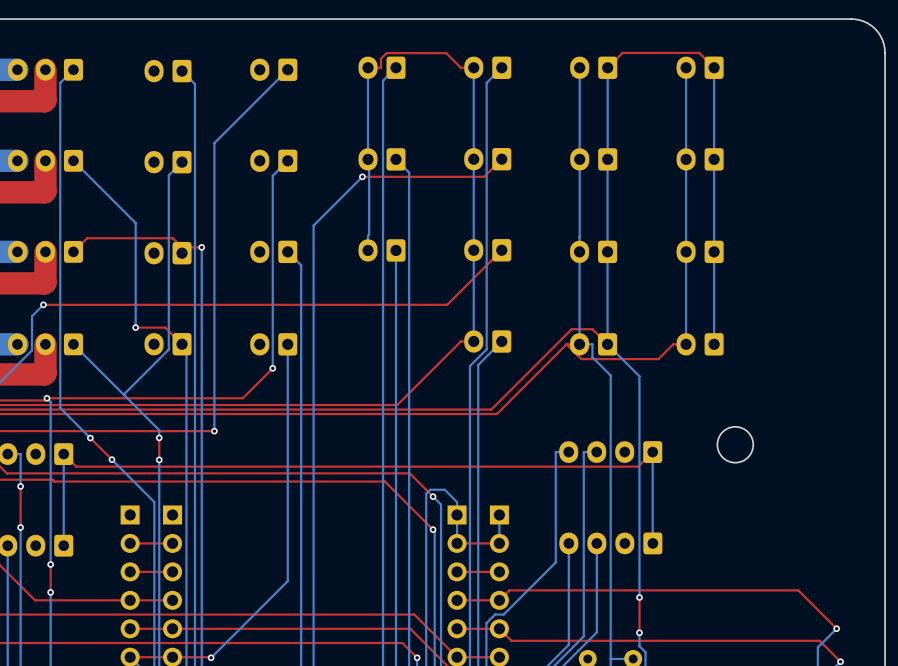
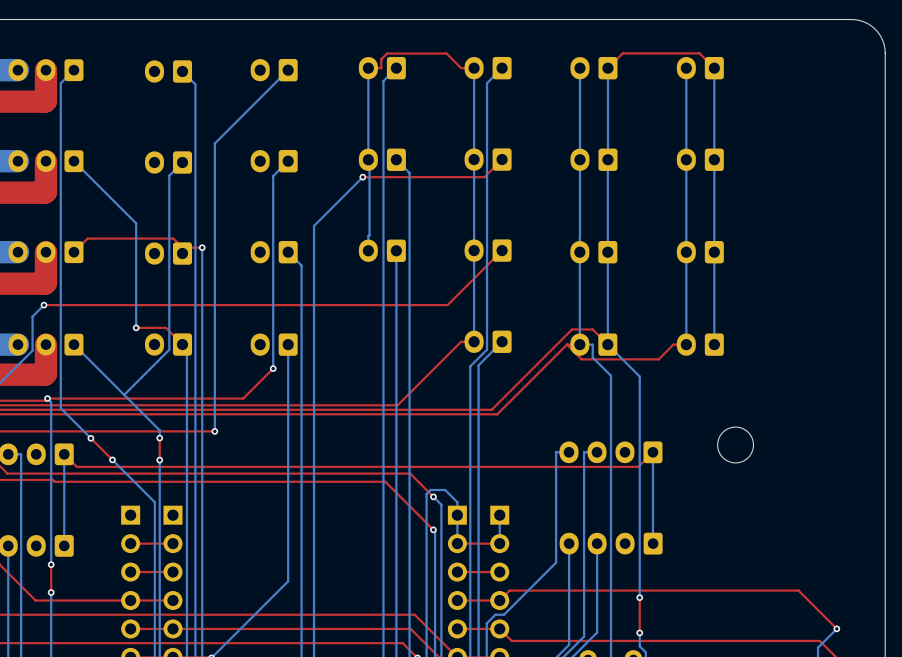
top track: (20, 486) (20, 527) -> none
bottom track: none -> (21, 486) (21, 527)
via: (20, 486) -> none
via: (20, 527) -> none

